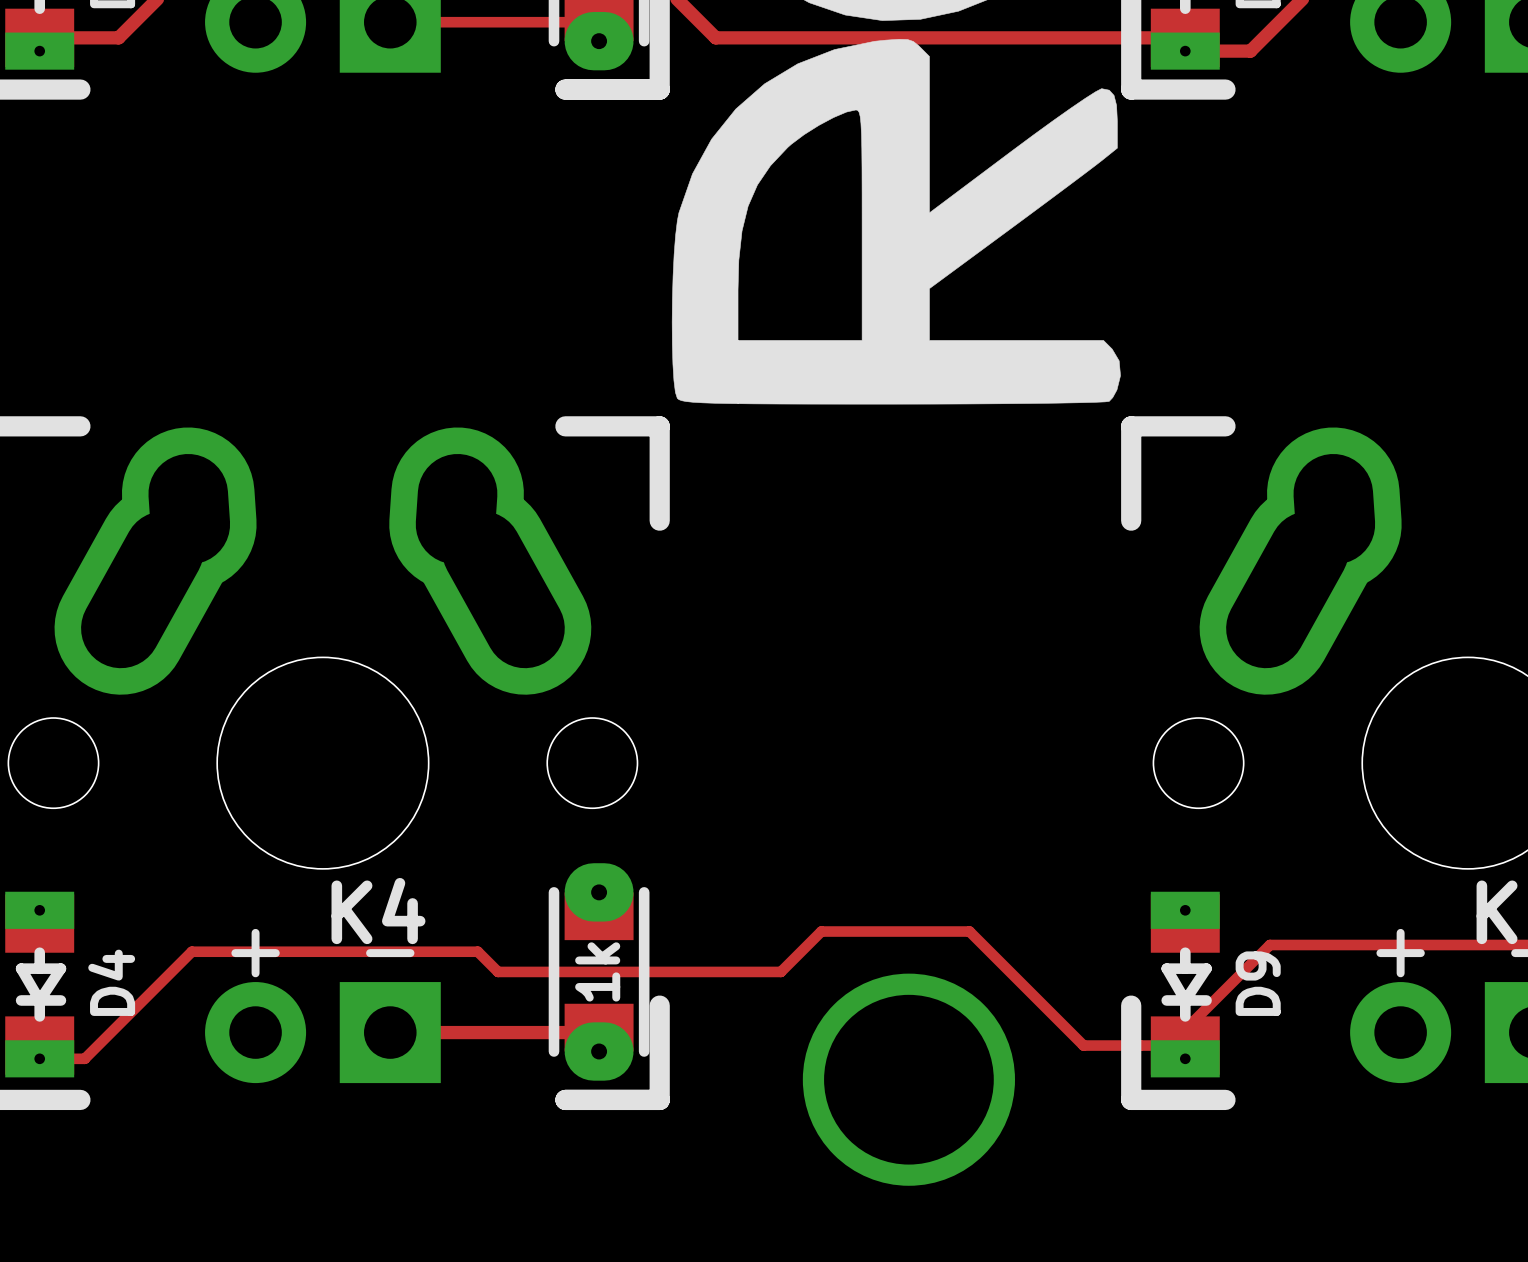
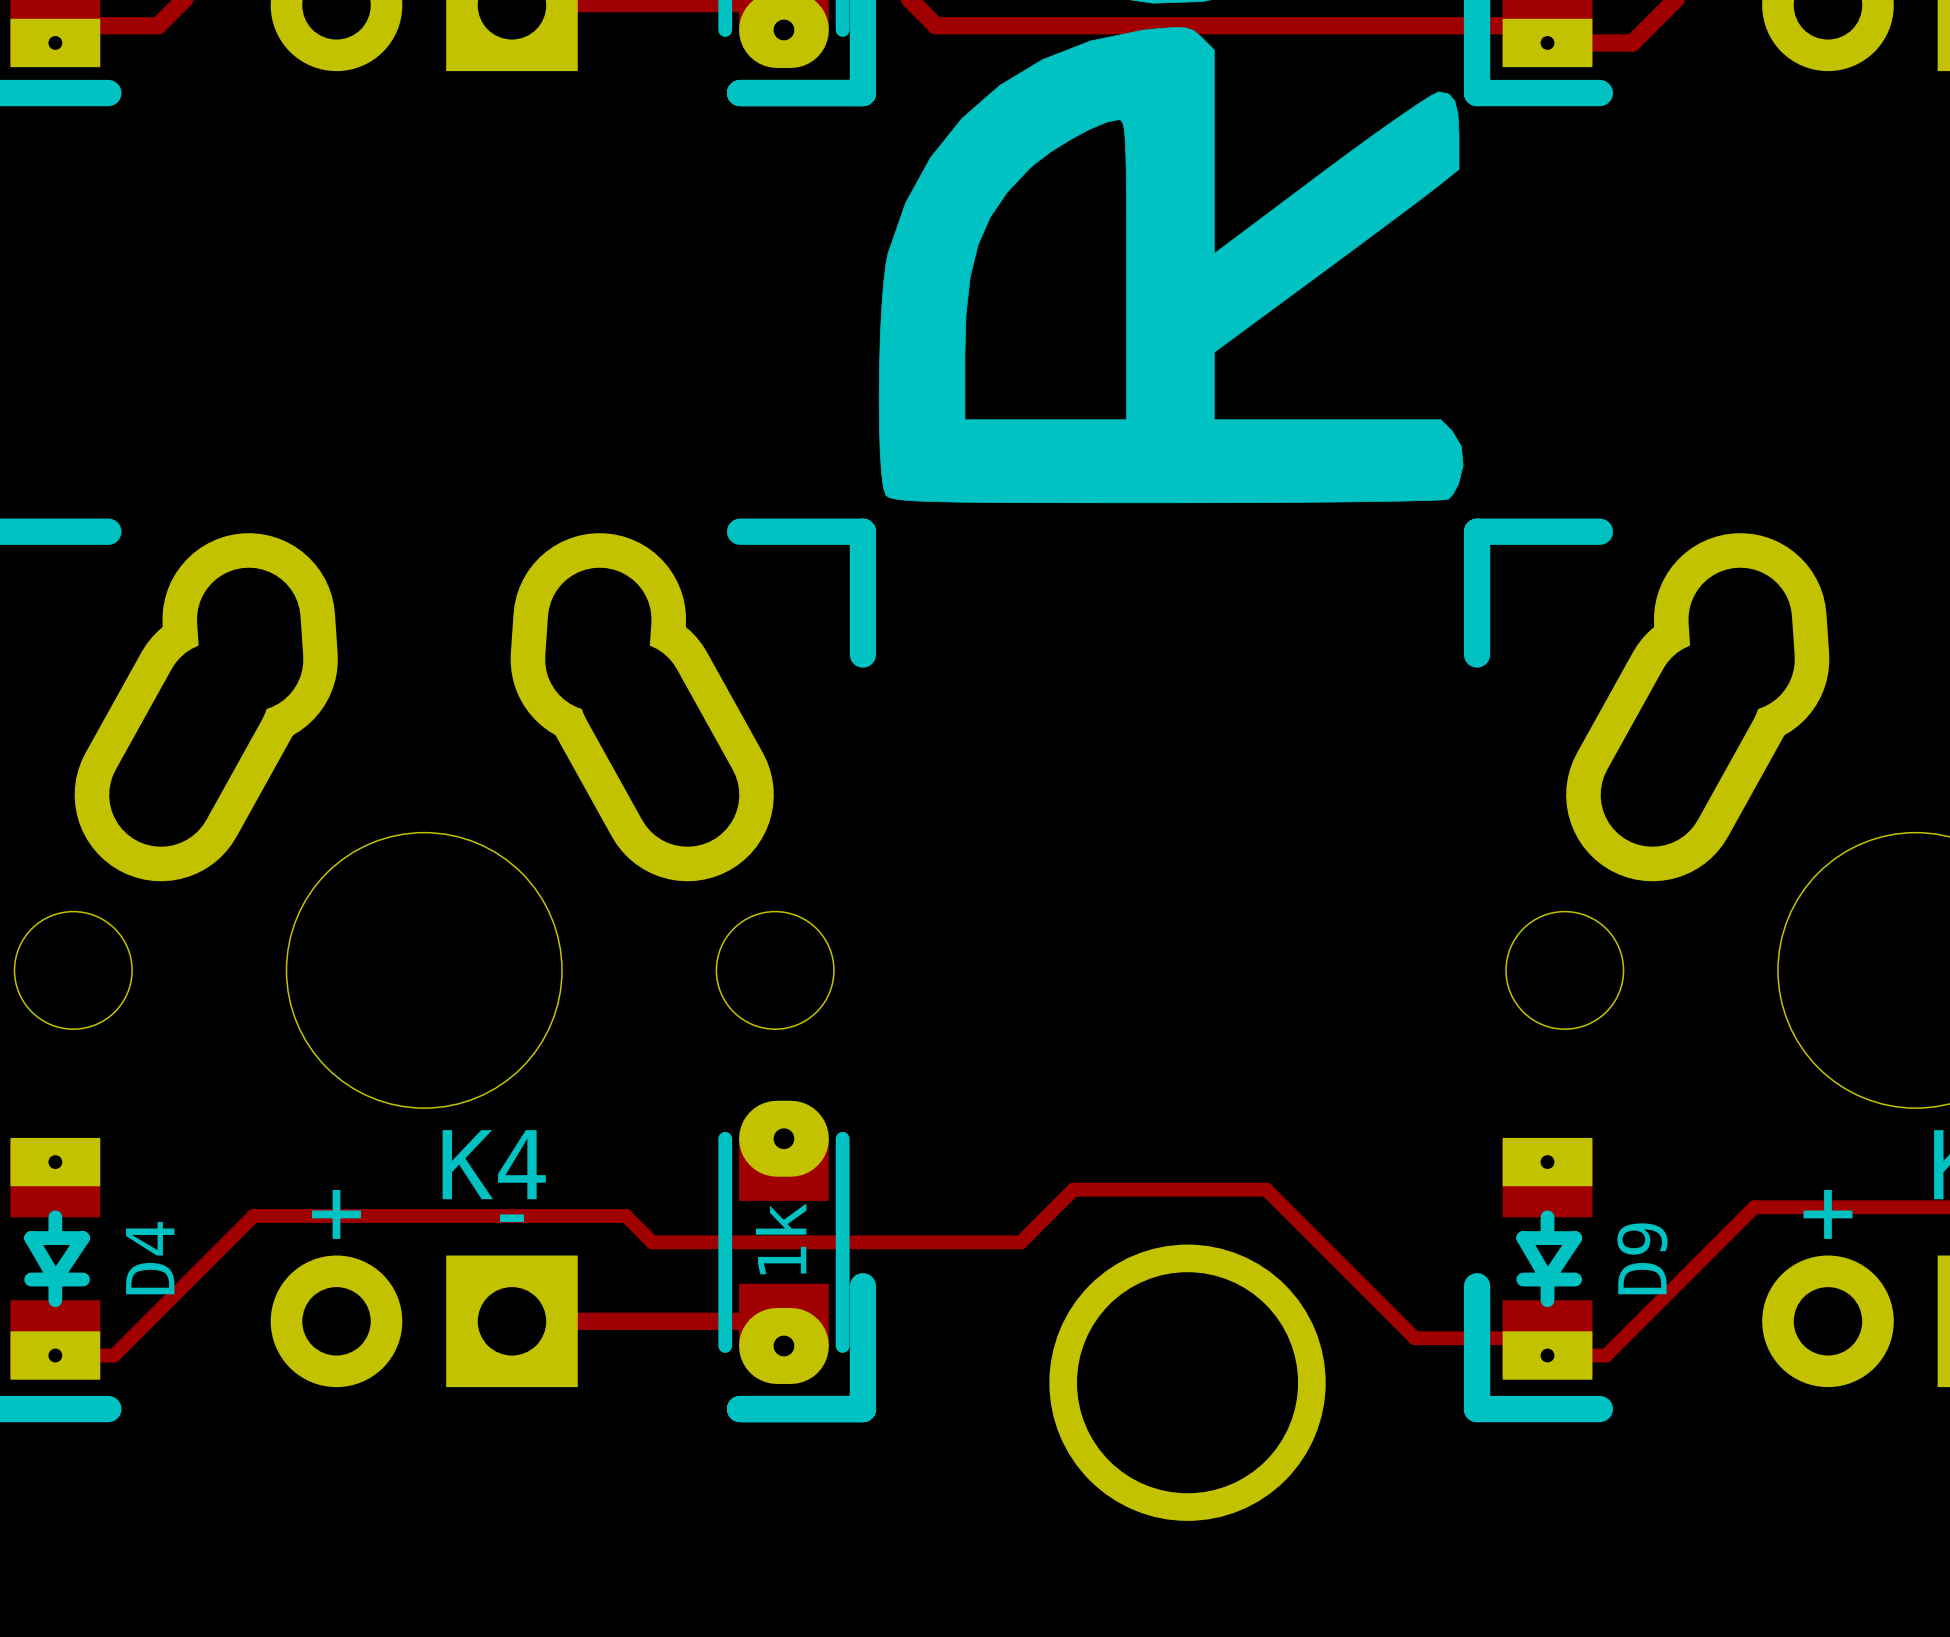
track: (1344, 944) (1269, 944) (1185, 1029) (1185, 1058) -> (1754, 1207) (1606, 1355) (1547, 1355)

